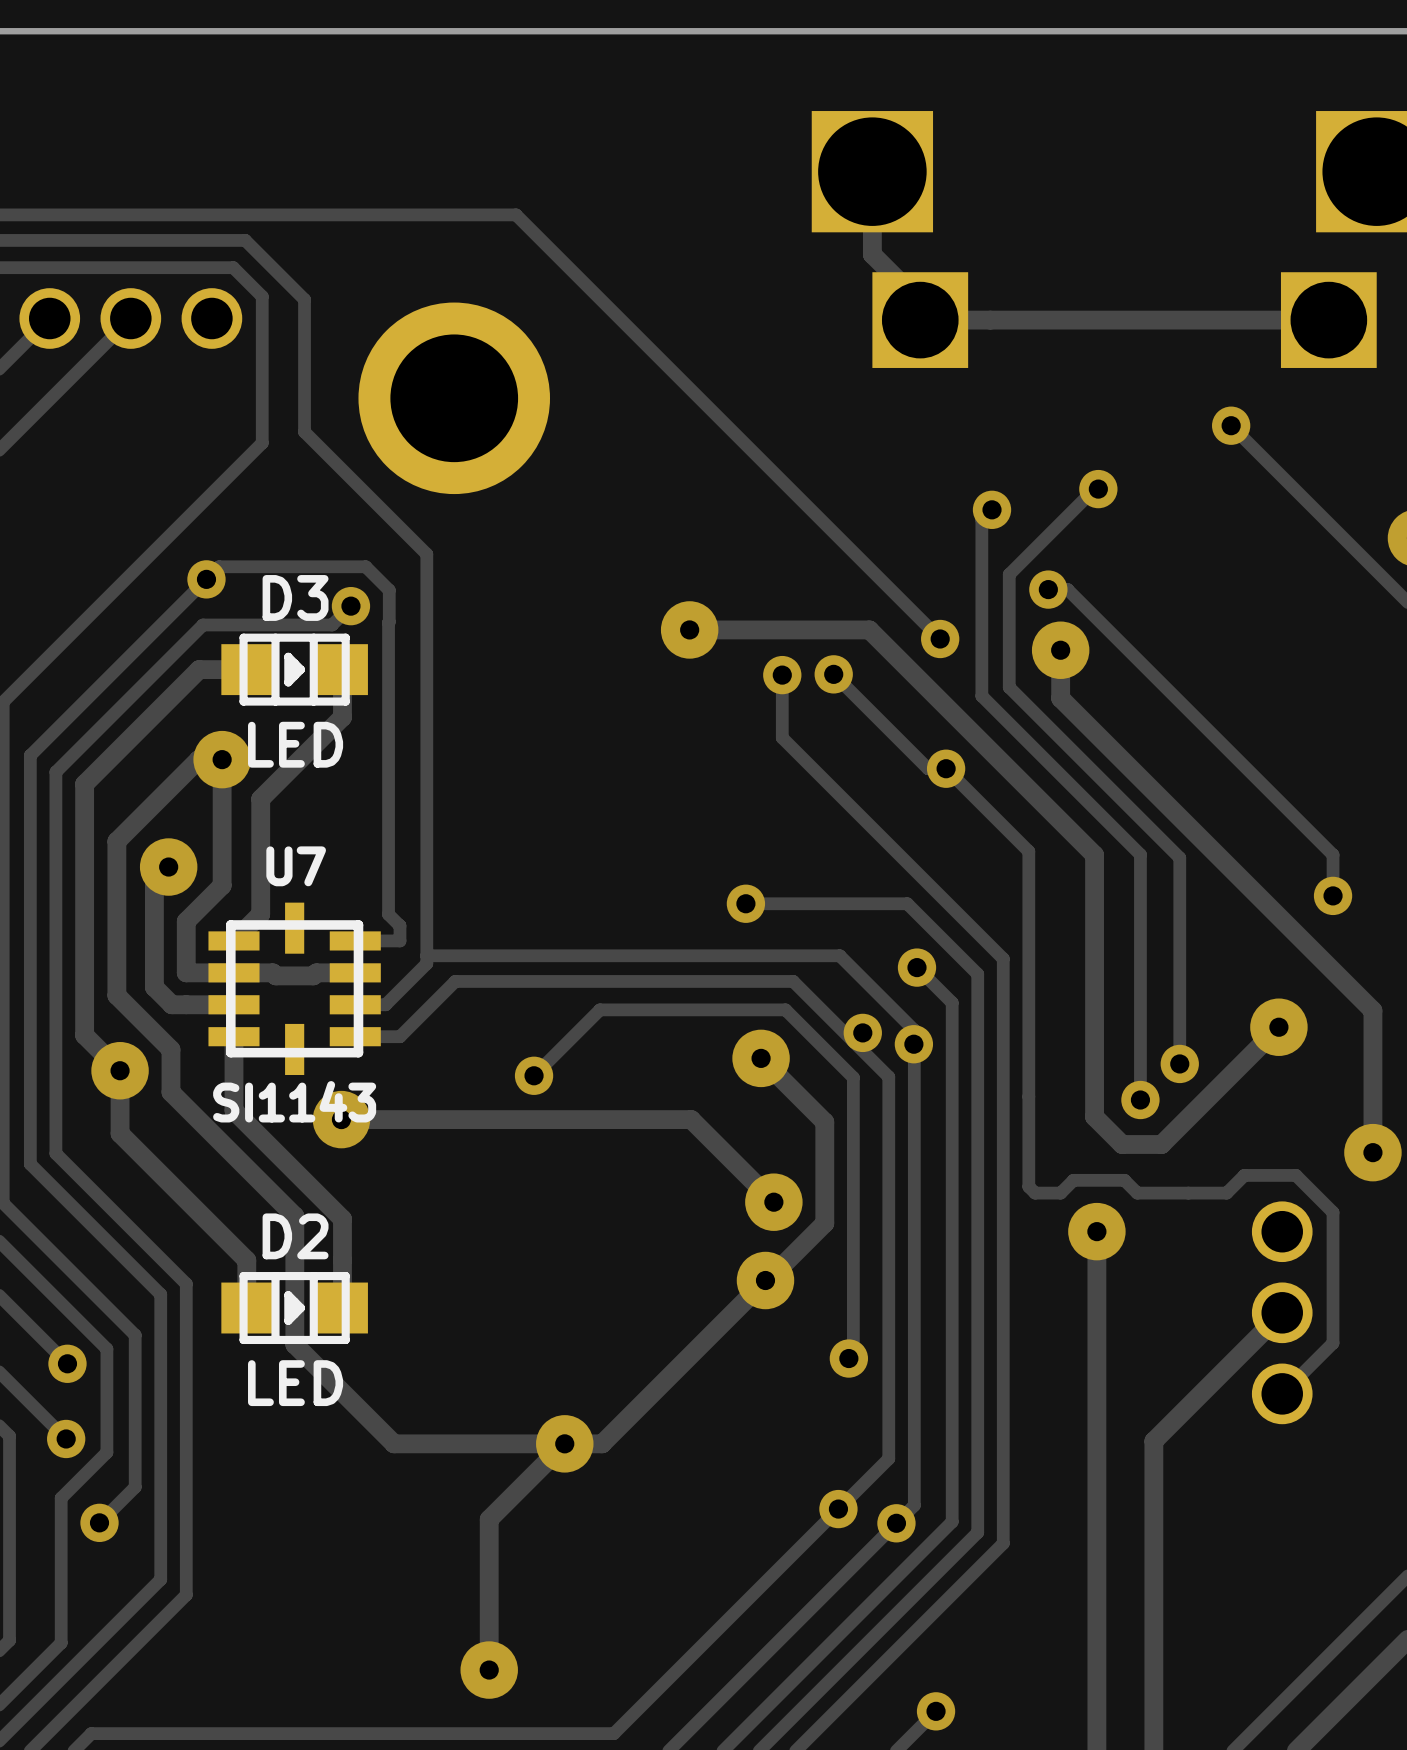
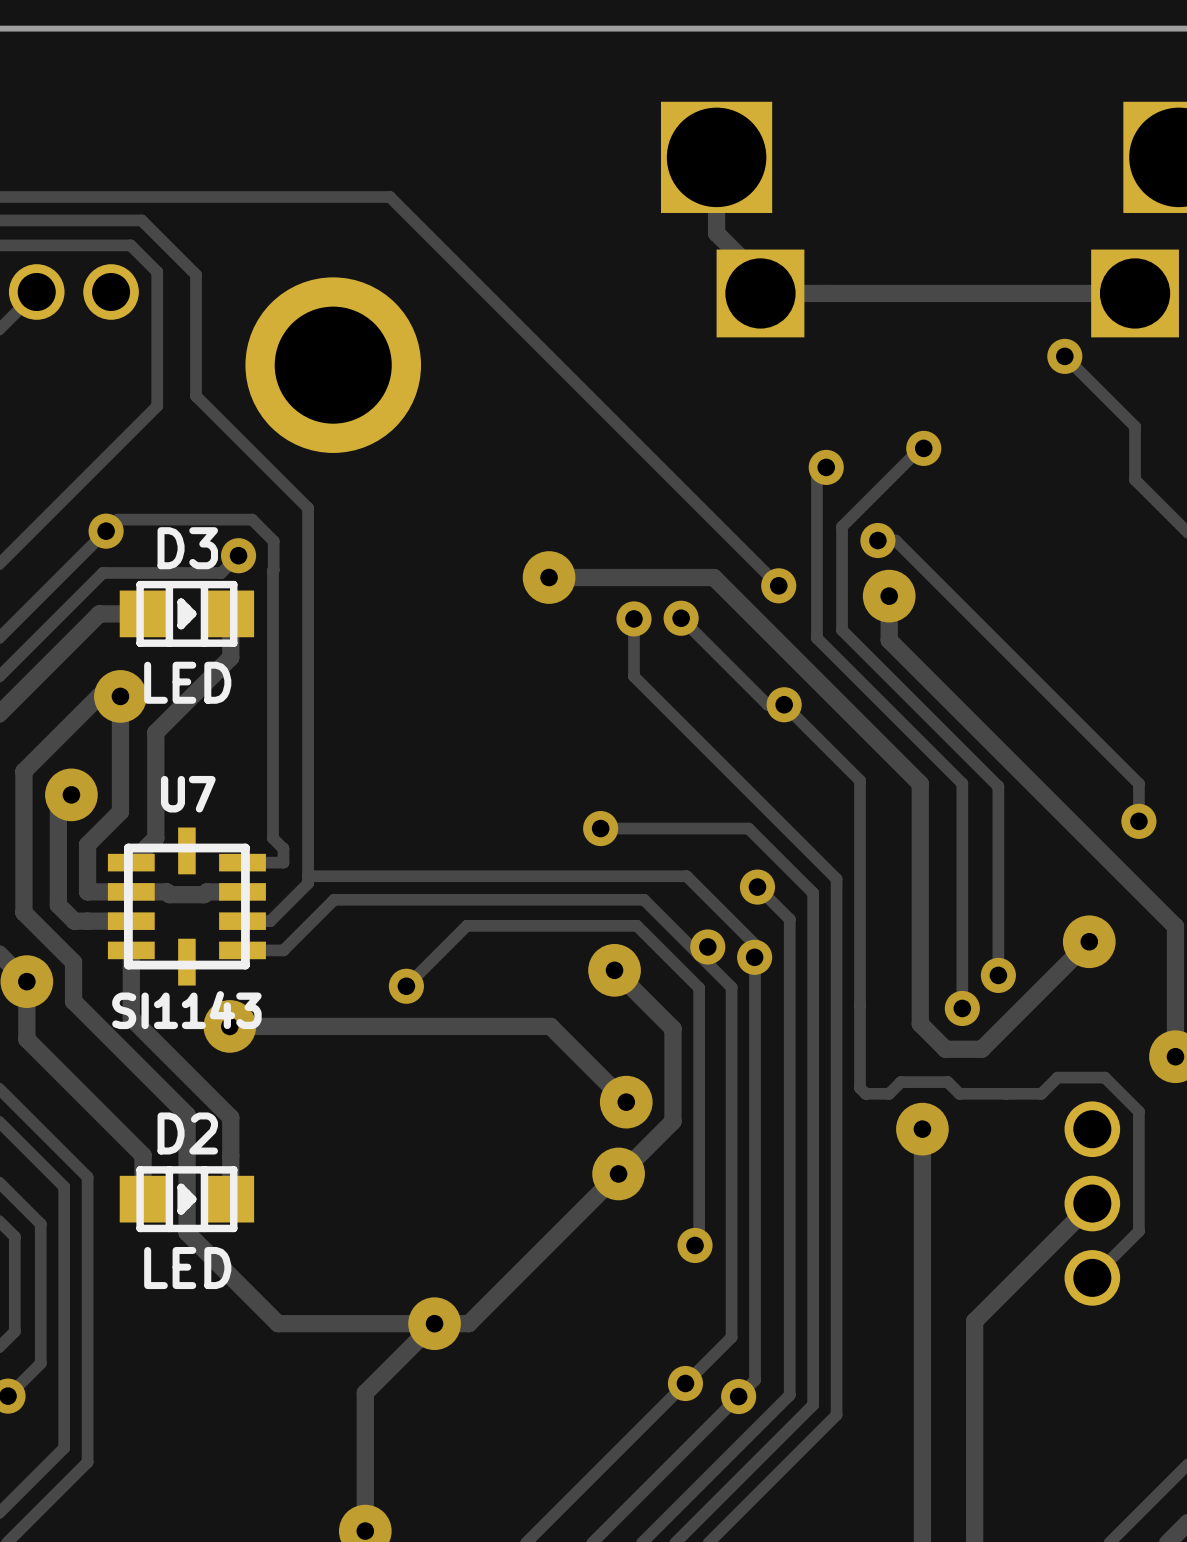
track: (1231, 425) (1328, 523) -> (1064, 356) (1135, 426) (1135, 479)
via position: (1231, 425) -> (1064, 356)

